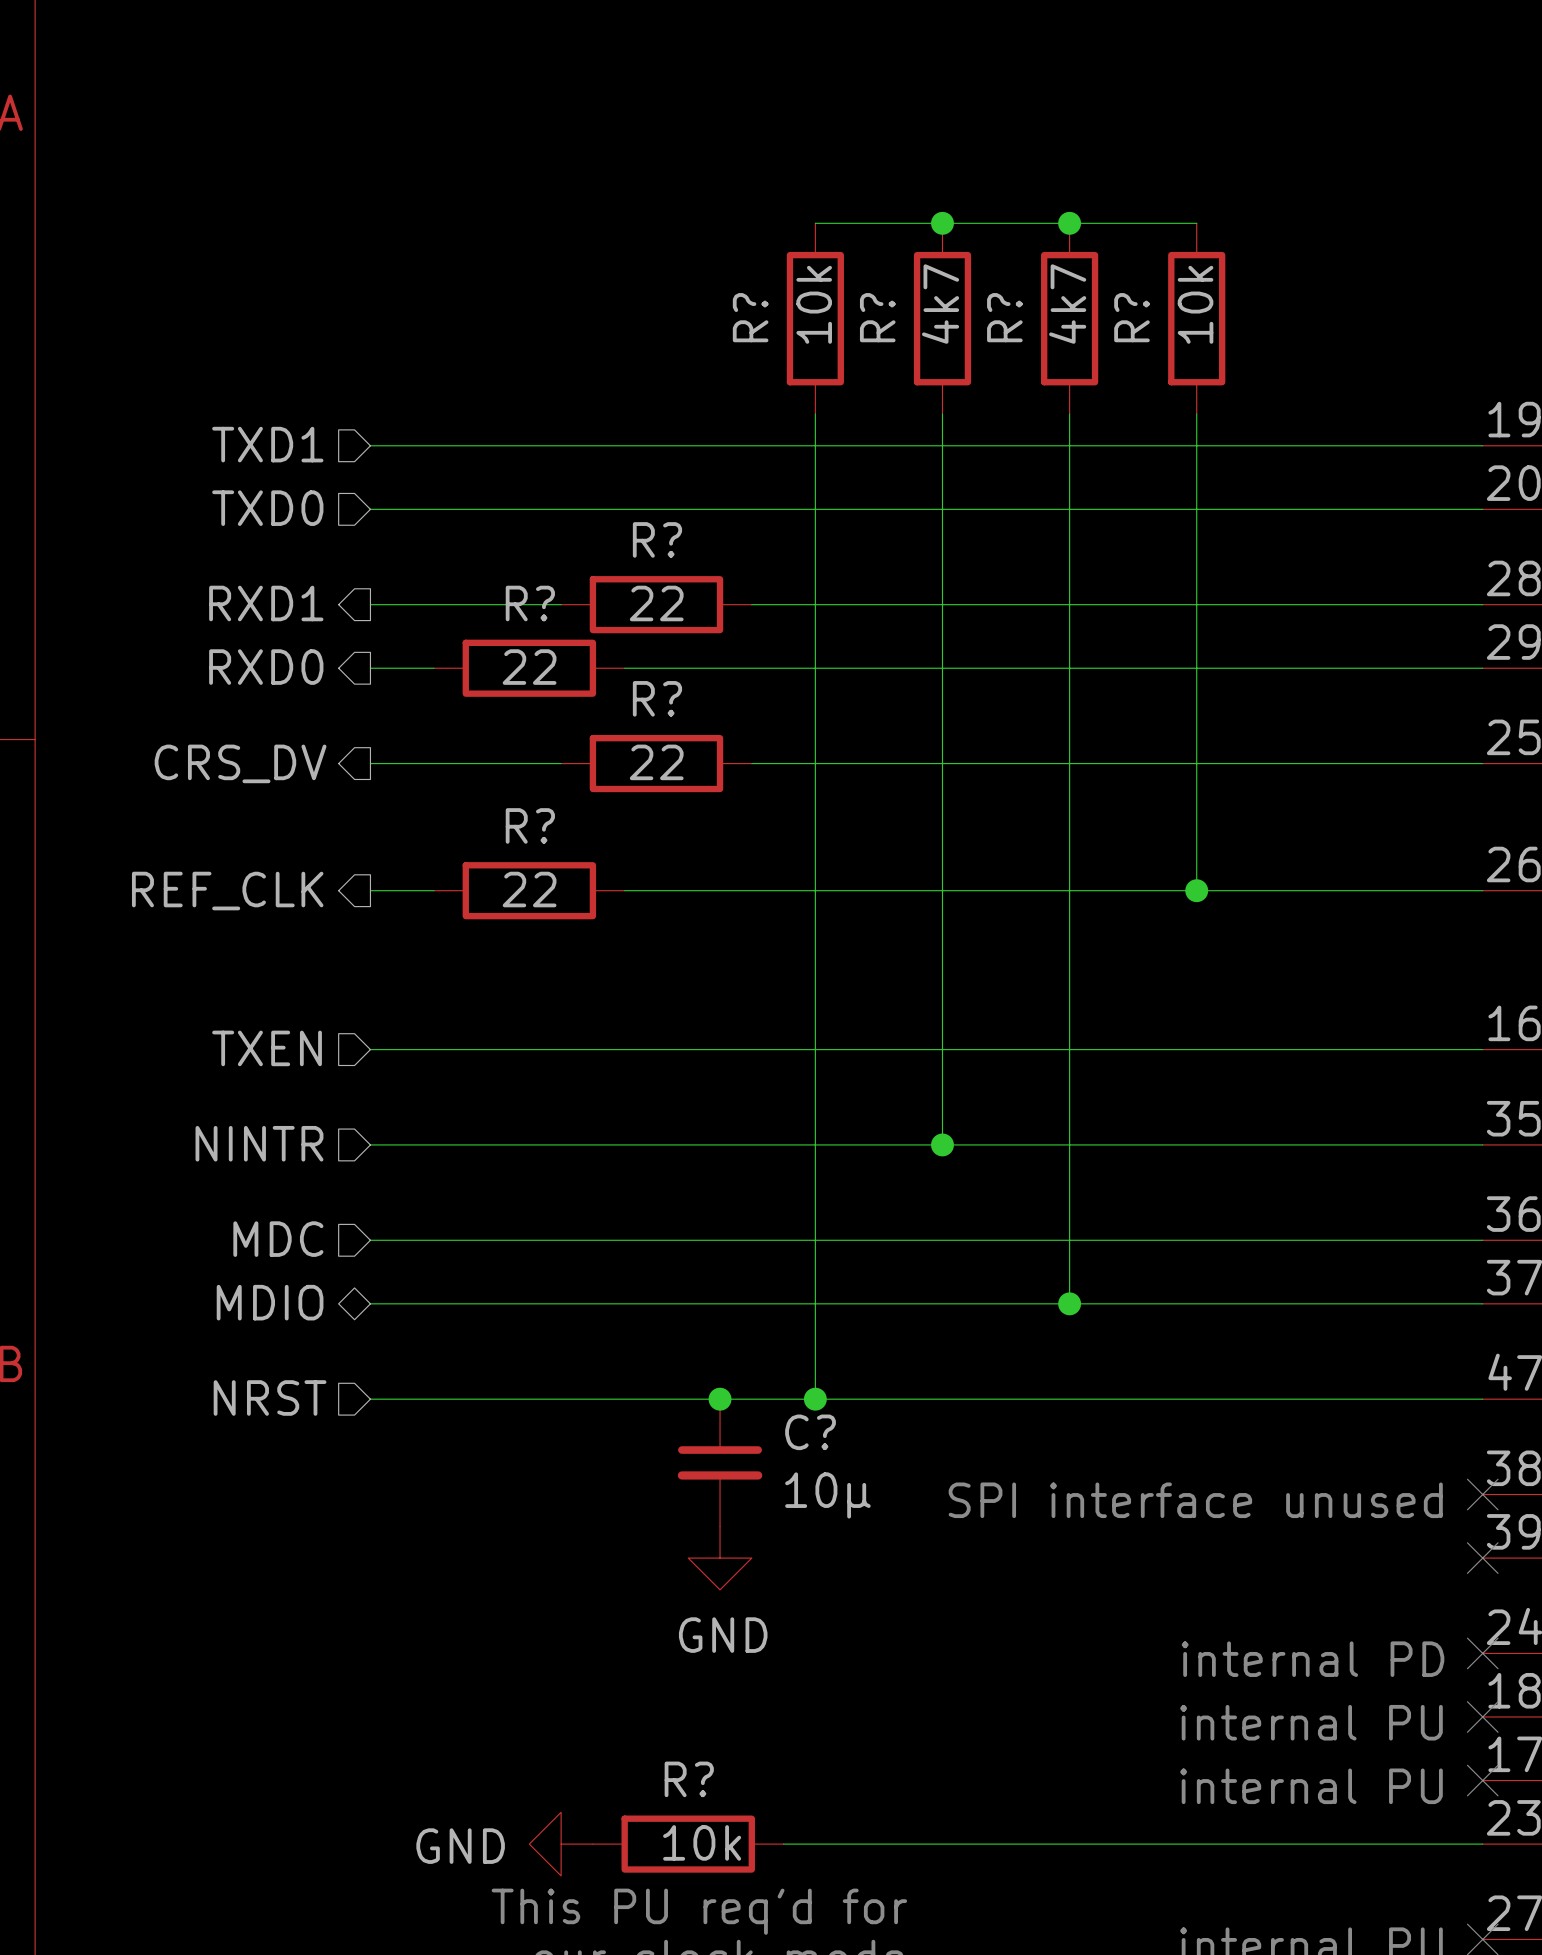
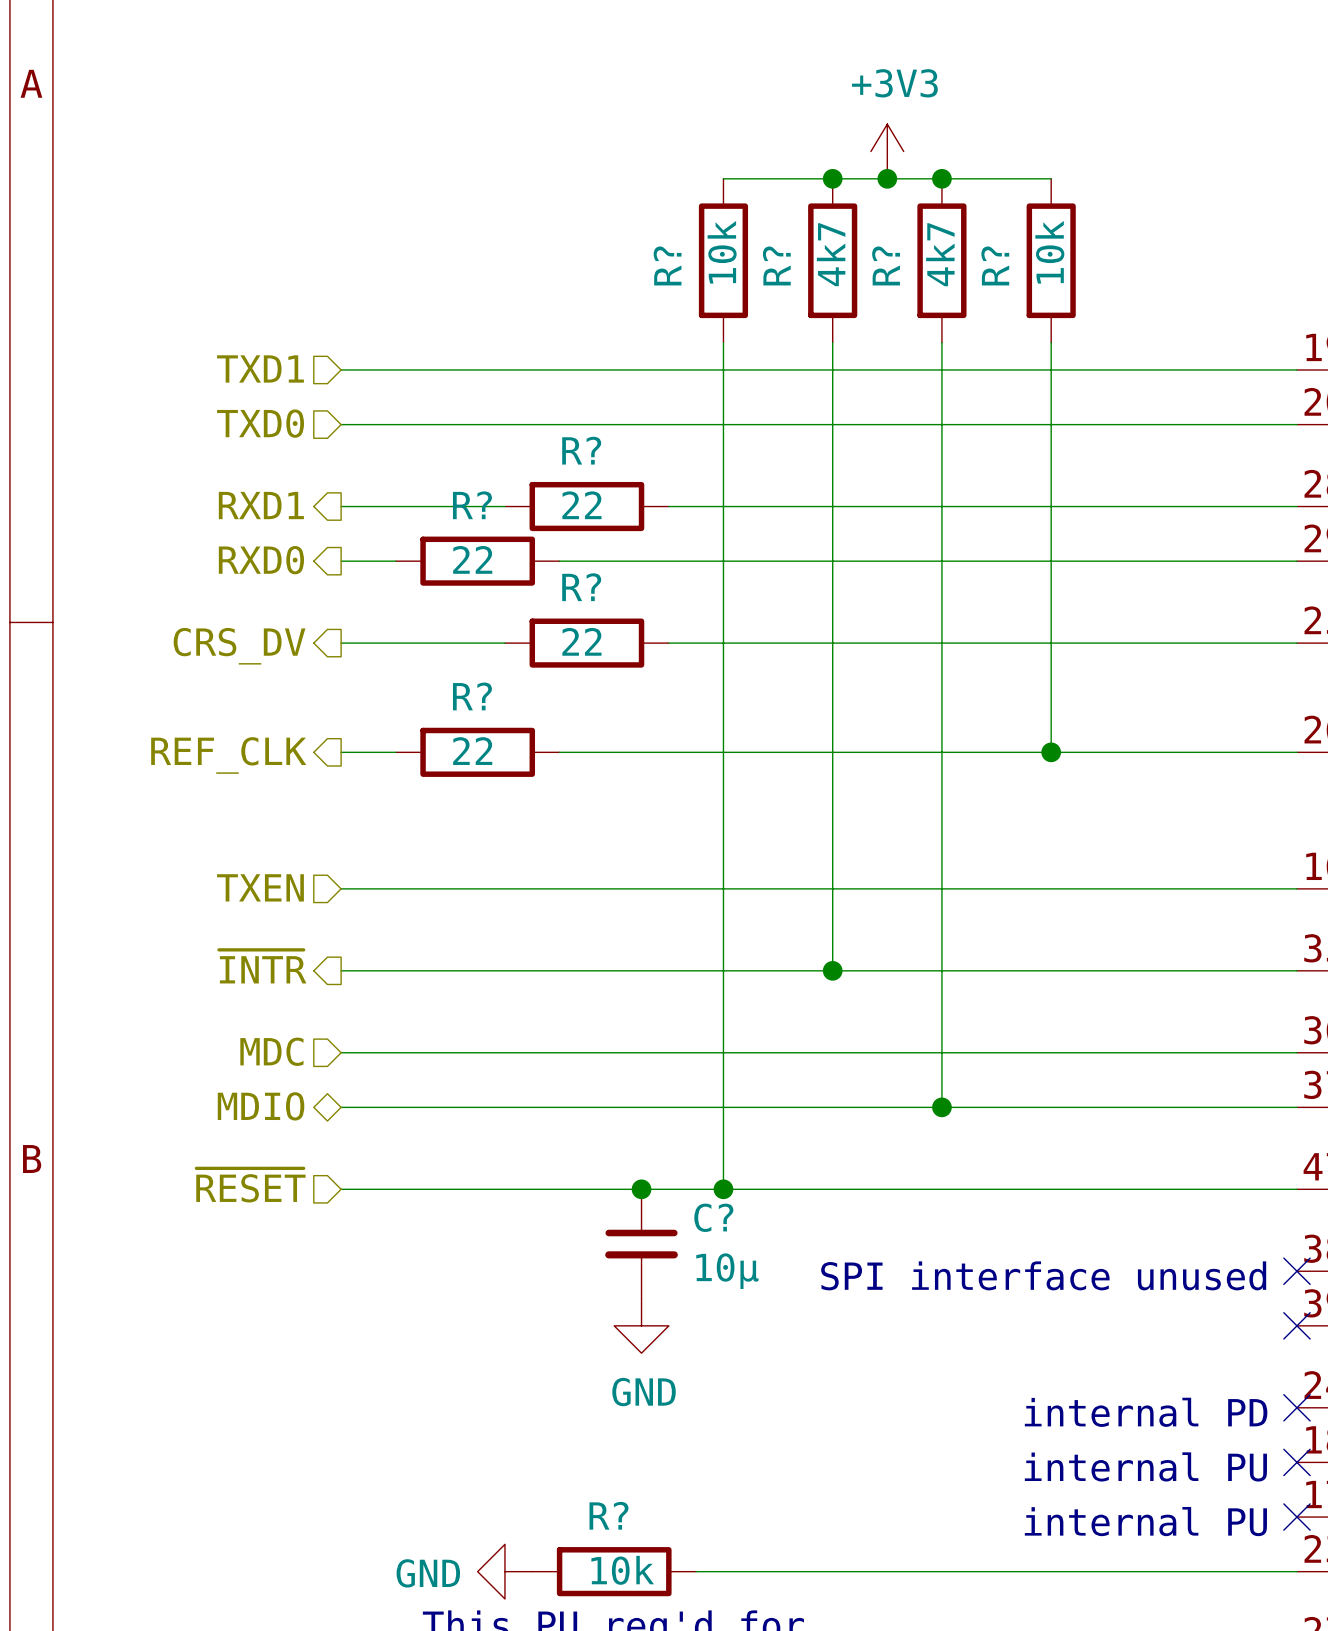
power symbol: none -> +3V3 (887, 151)
junction: none -> (887, 178)
hierarchical label shape: input (259, 1143) -> output (262, 966)
hierarchical label: NINTR (259, 1143) -> ~{INTR} (262, 966)
hierarchical label: NRST (270, 1397) -> ~{RESET} (250, 1185)

